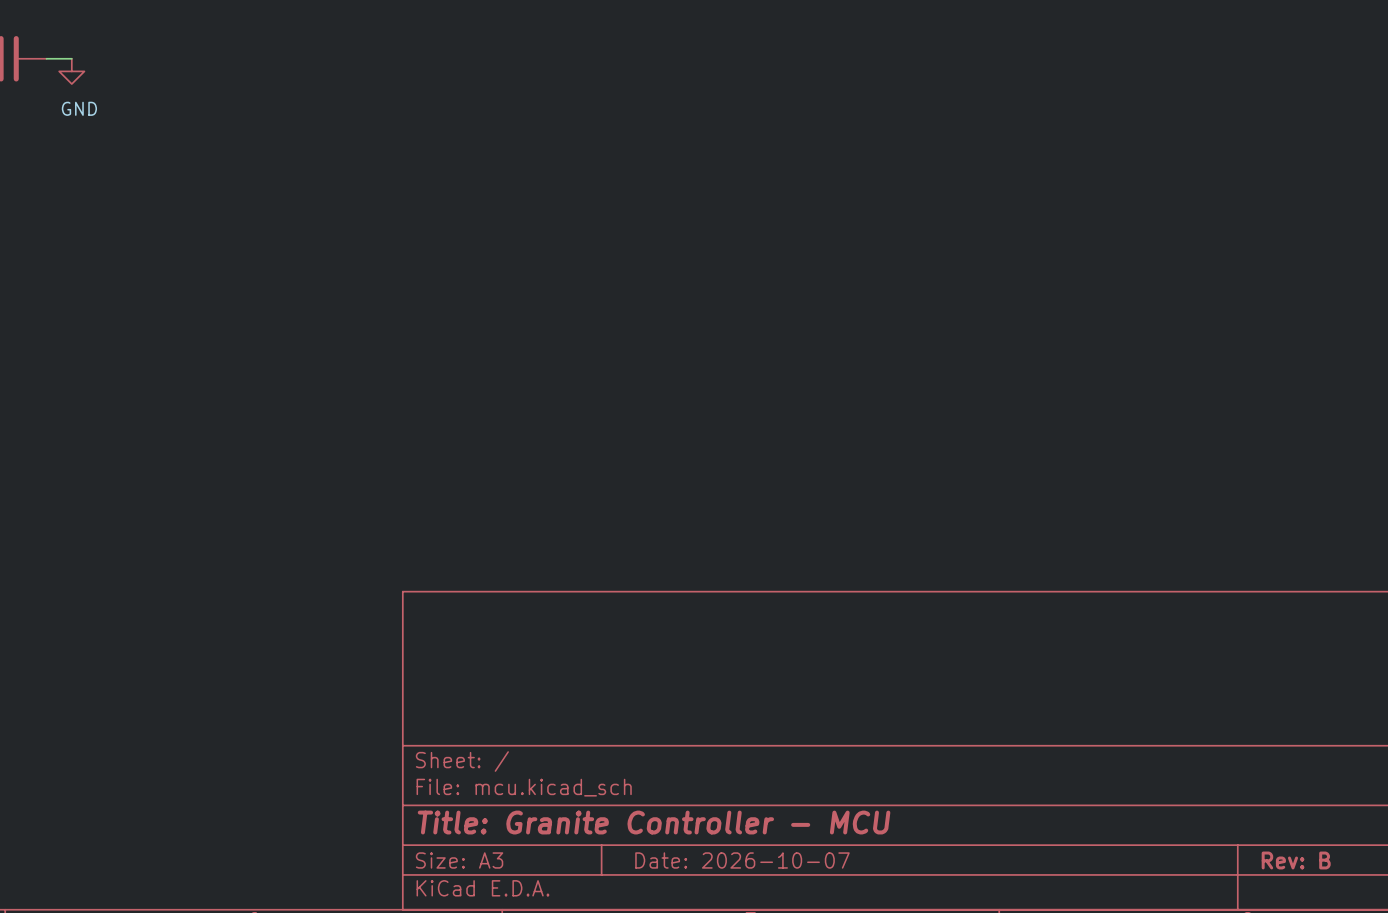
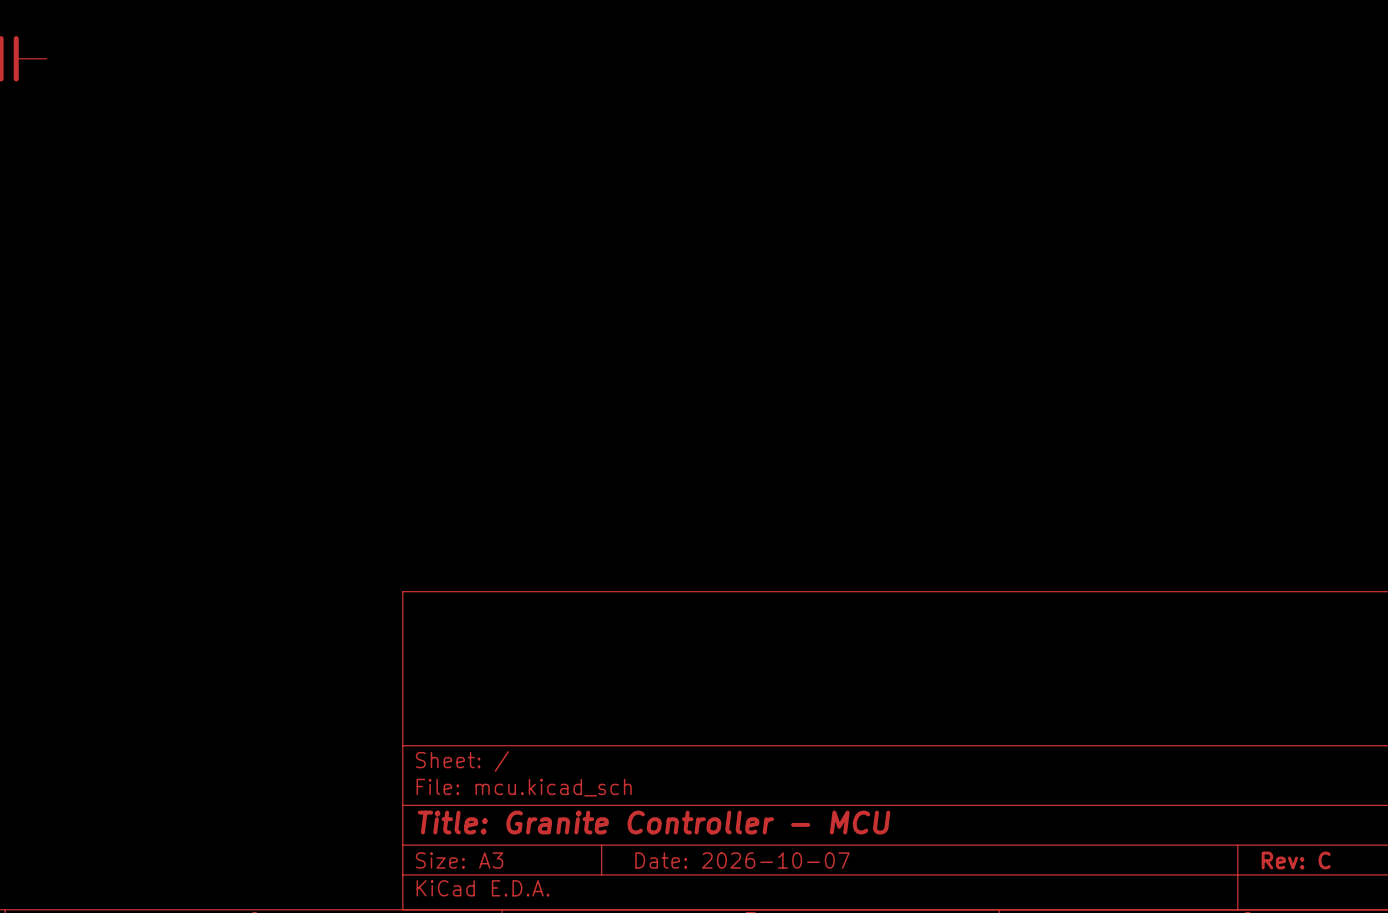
wire: (46, 58) (71, 58) -> none
power symbol: GND (71, 71) -> none
title block: Rev: B (1296, 860) -> Rev: C (1296, 860)

